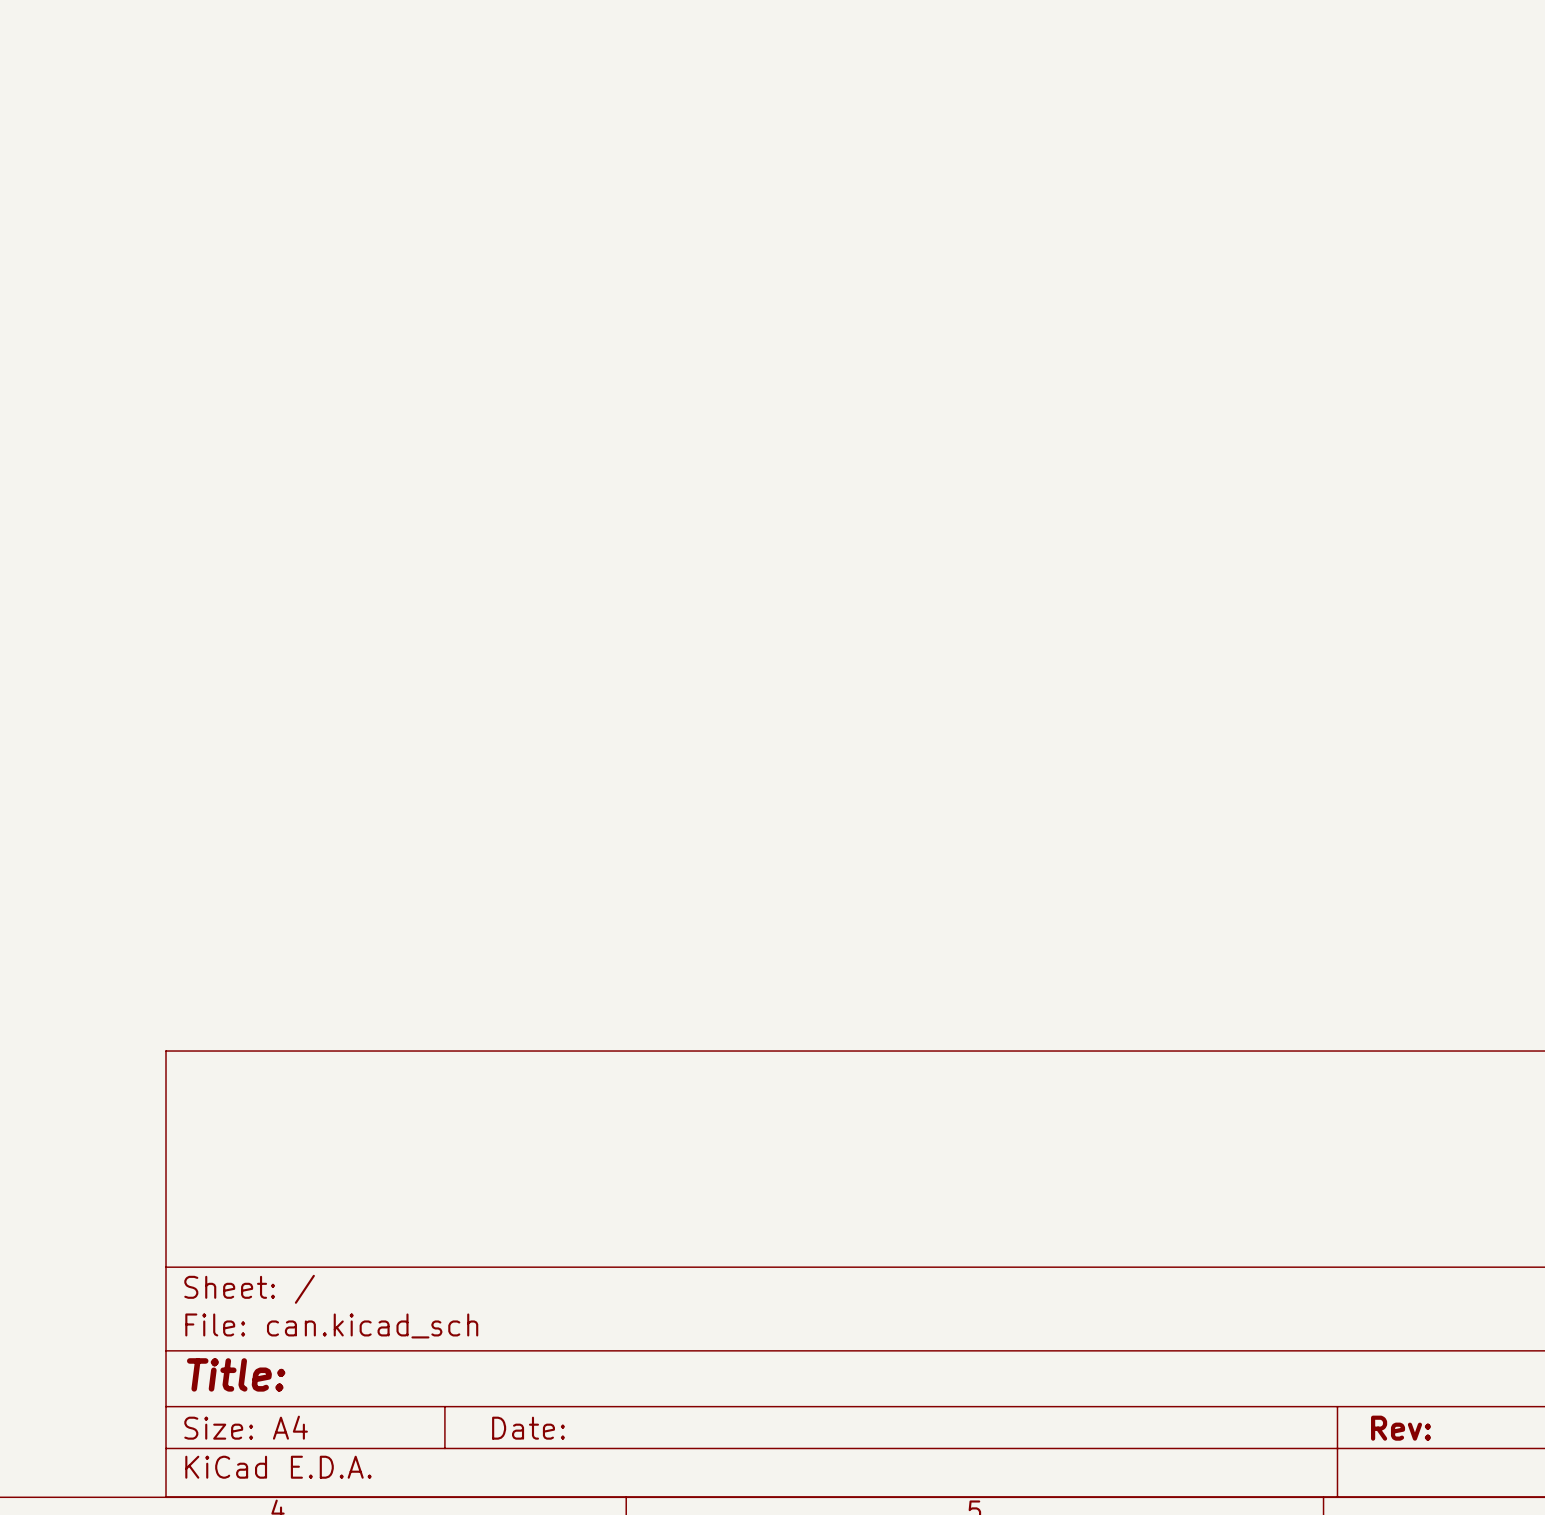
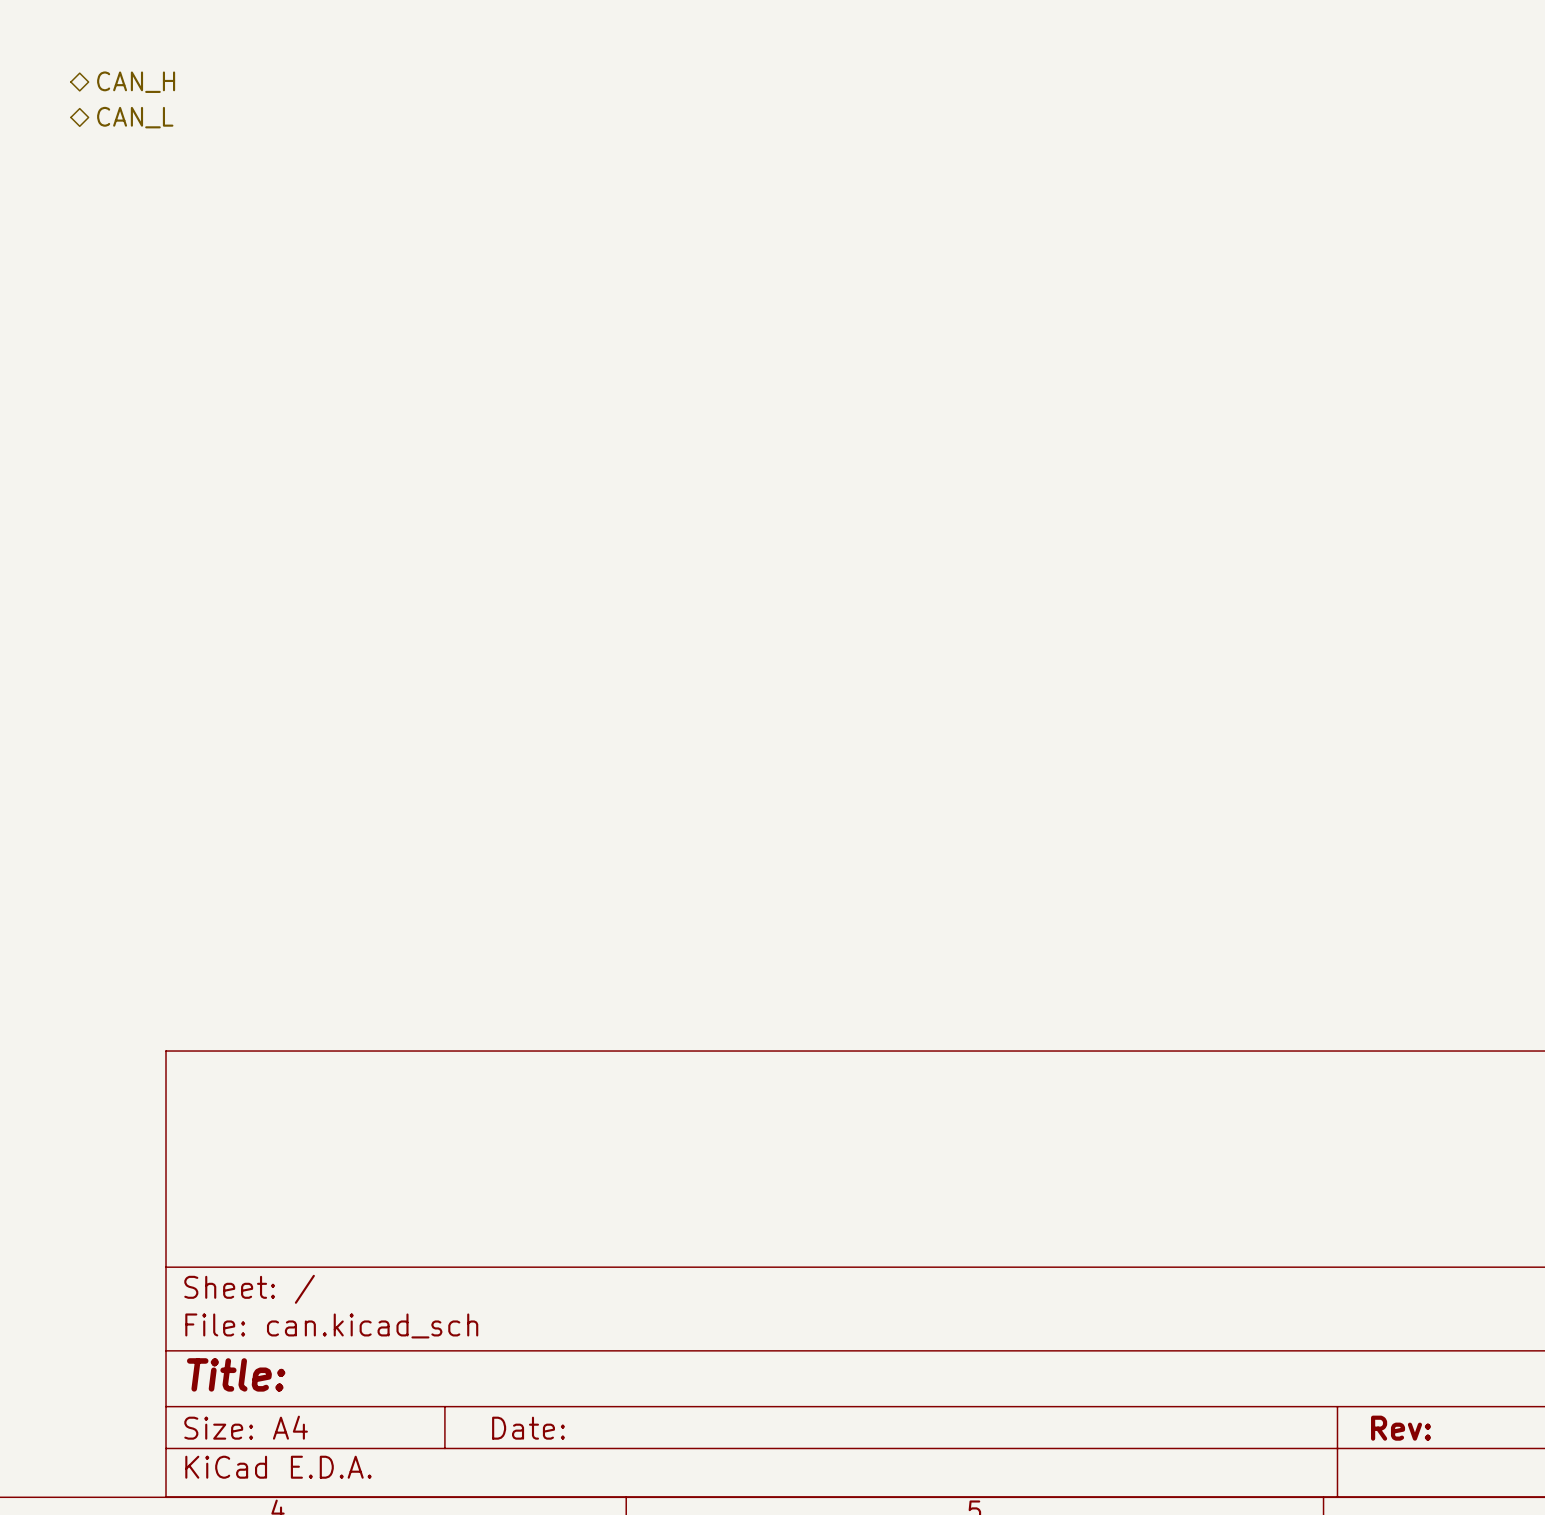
hierarchical label: none -> CAN_H (136, 82)
hierarchical label: none -> CAN_L (135, 117)

